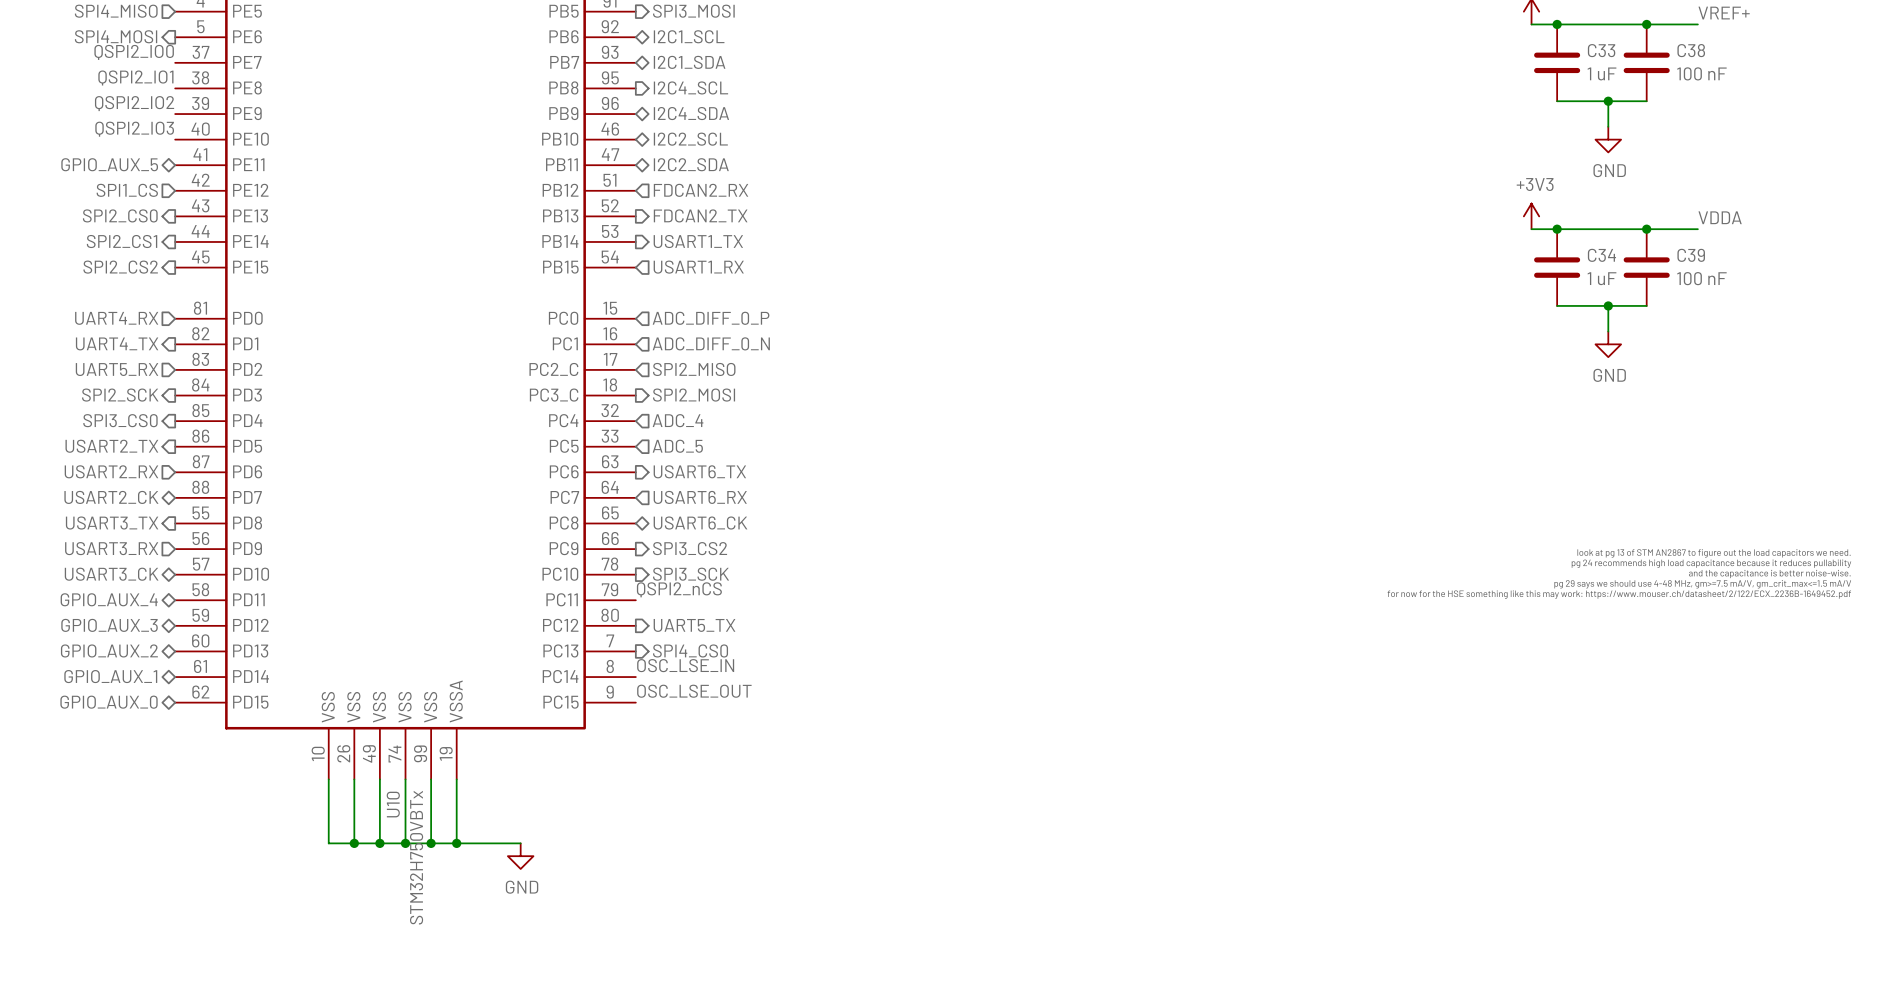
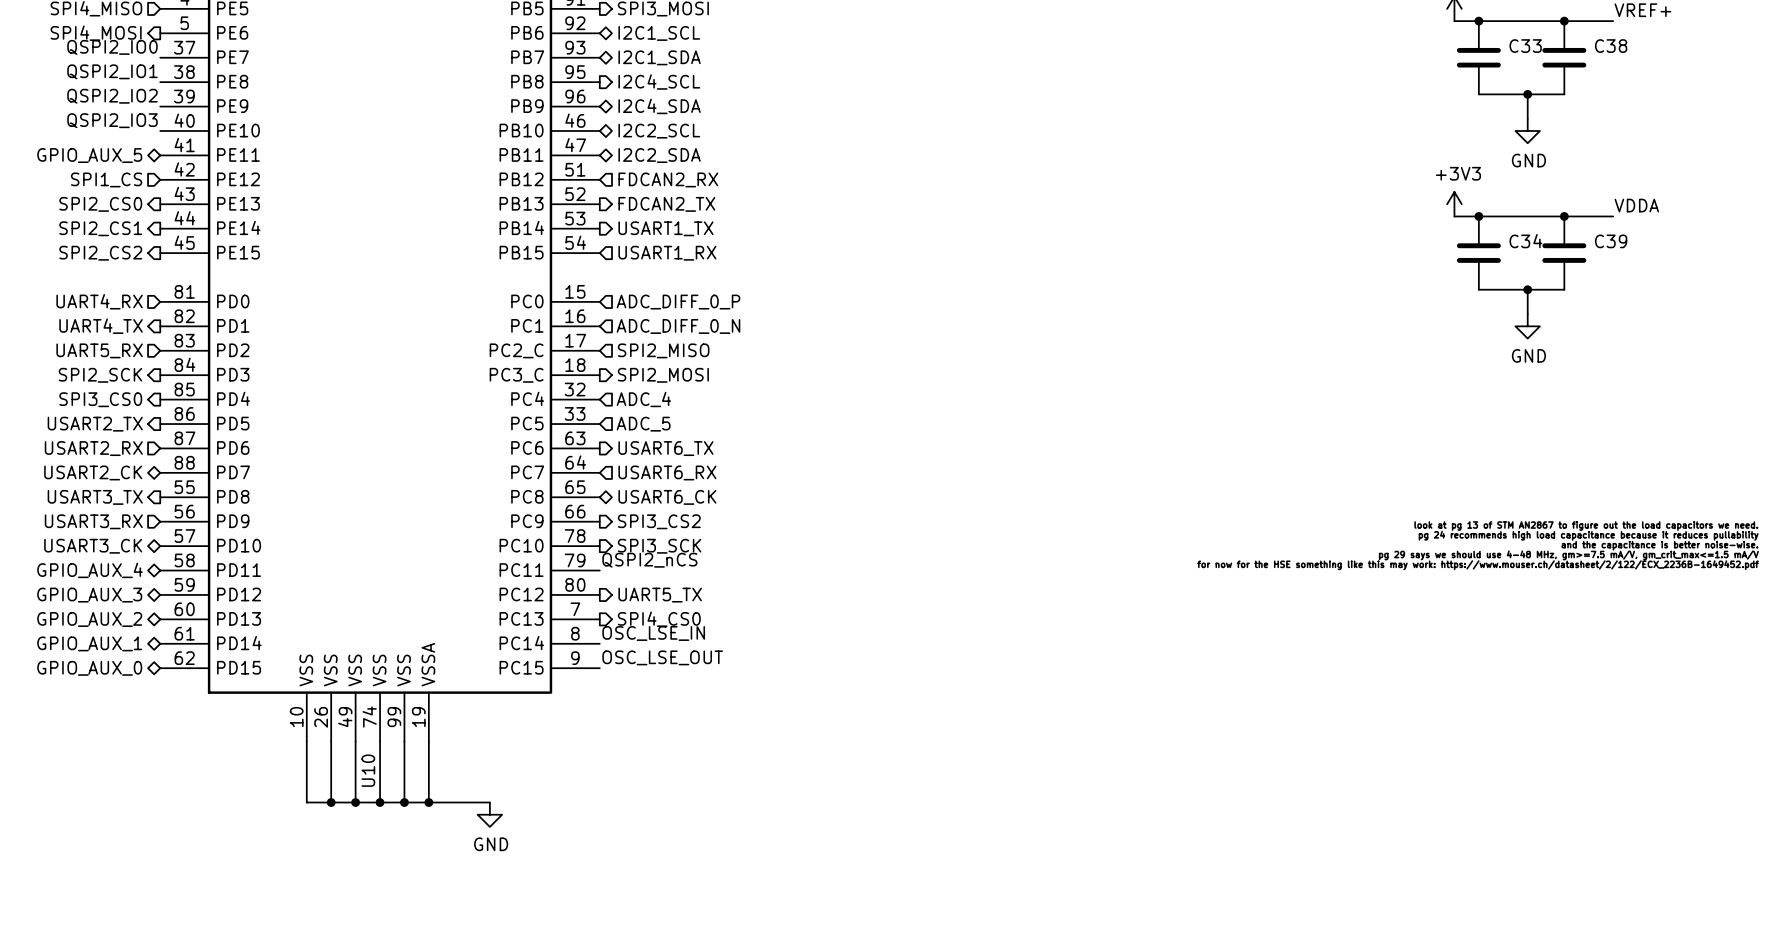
C33 value: 1 uF (1602, 73) -> none
C38 value: 100 nF (1701, 73) -> none
C34 value: 1 uF (1602, 278) -> none
C39 value: 100 nF (1701, 278) -> none
U10 value: STM32H750VBTx (416, 857) -> none

